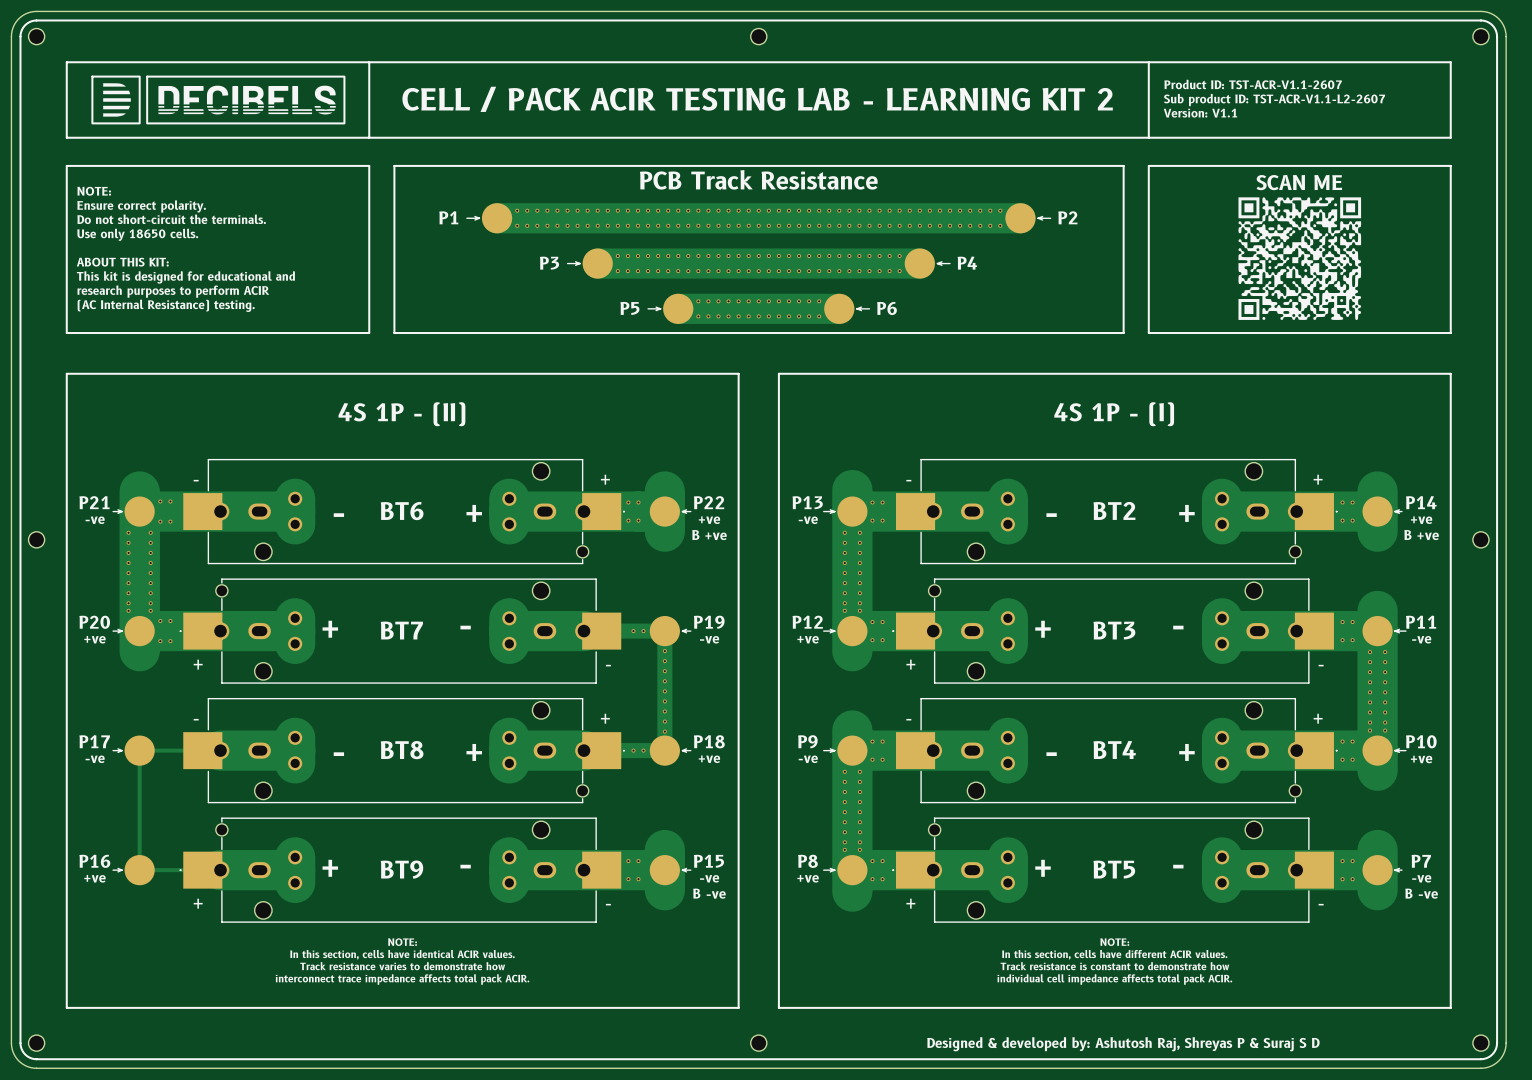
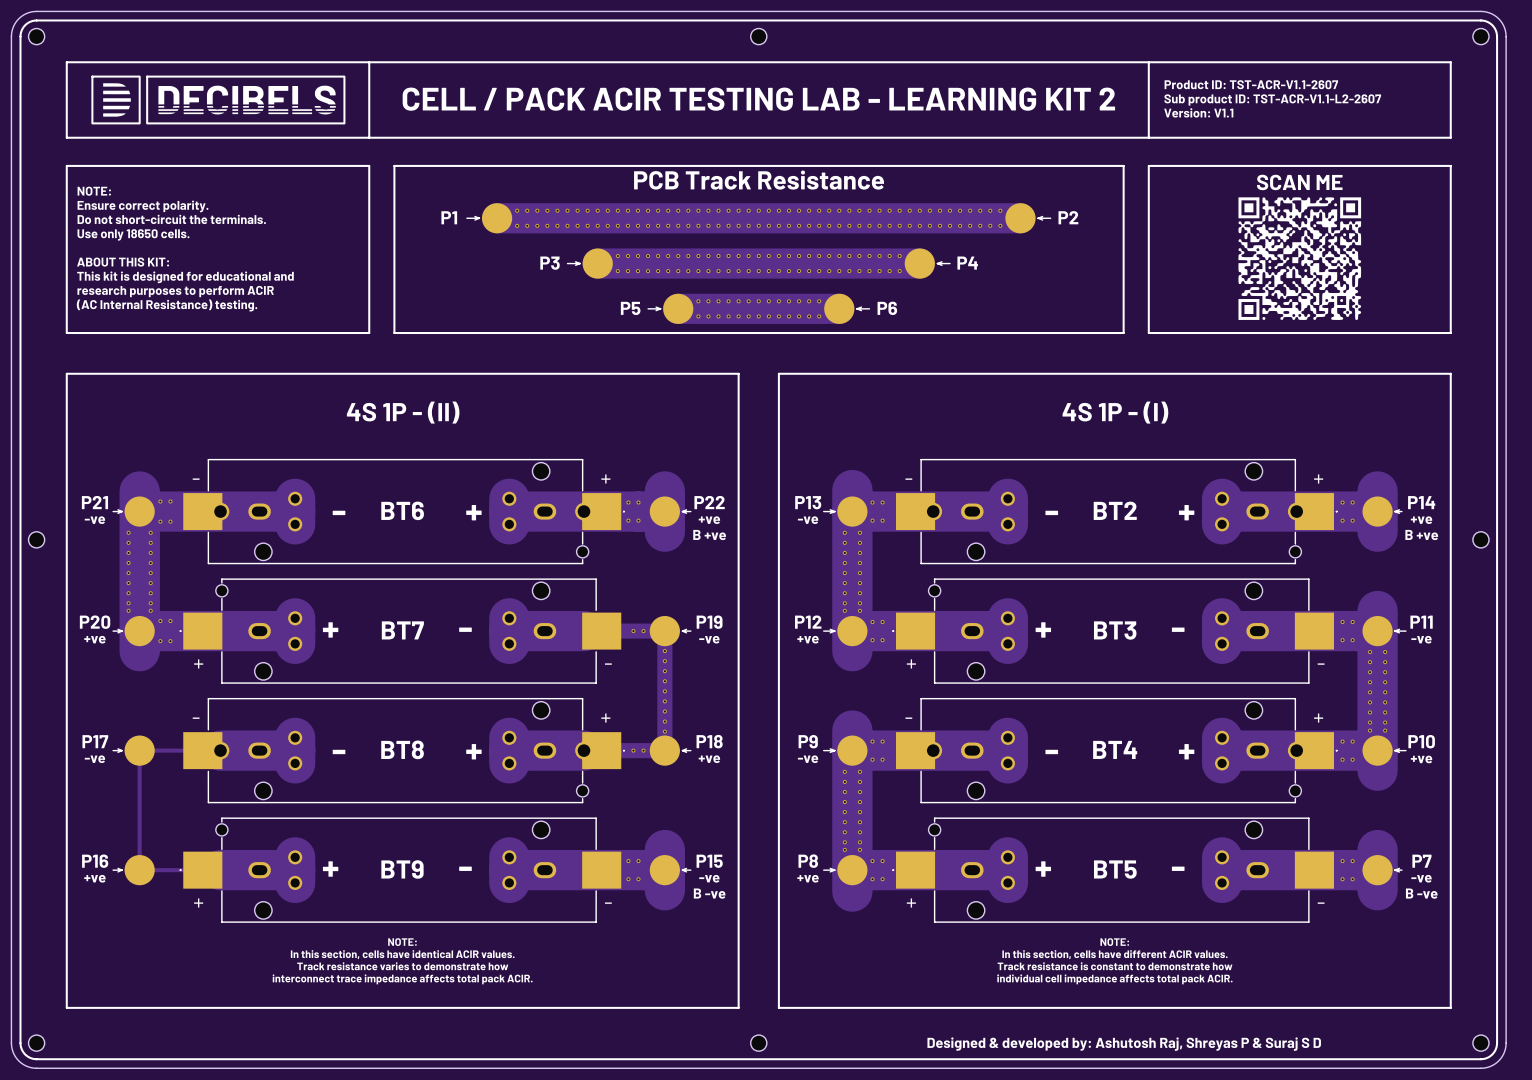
BT7 footprint: [180, 578, 622, 684] -> [180, 578, 622, 684]
BT3 footprint: [892, 578, 1334, 684] -> [892, 578, 1334, 684]
BT9 footprint: [180, 817, 622, 923] -> [180, 817, 622, 923]
BT5 footprint: [892, 817, 1334, 923] -> [892, 817, 1334, 923]

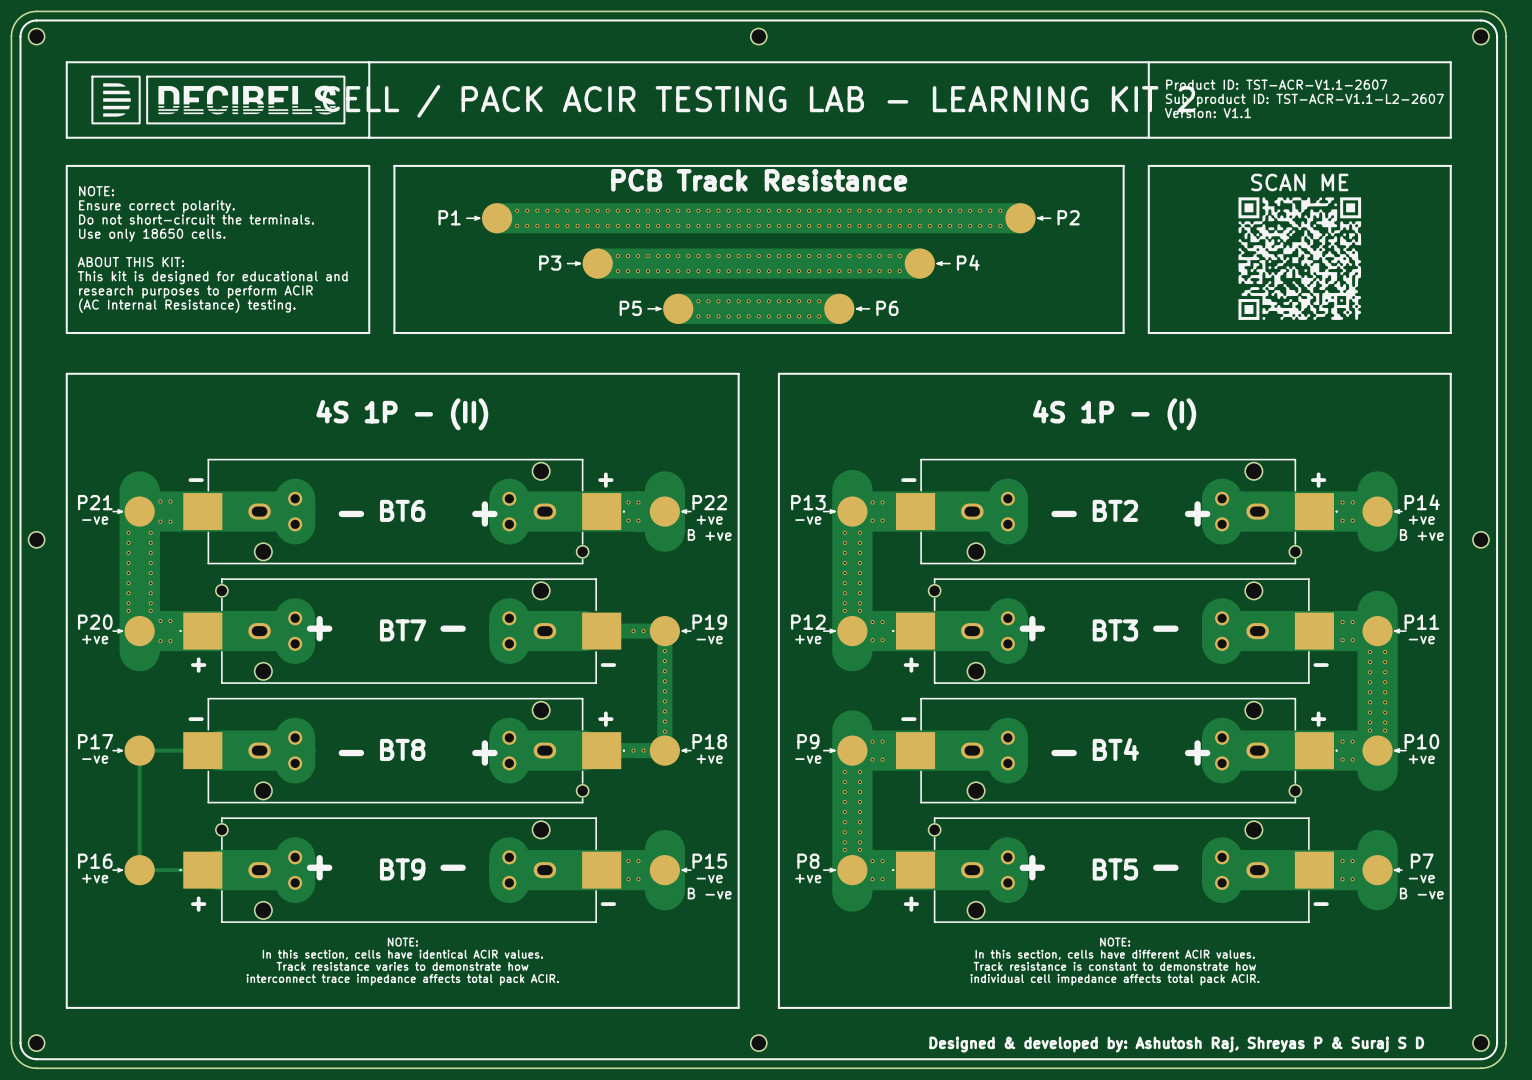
BT6 footprint: [183, 459, 625, 565] -> [183, 459, 625, 565]
BT2 footprint: [895, 459, 1338, 565] -> [895, 459, 1338, 565]
BT8 footprint: [183, 698, 625, 804] -> [183, 698, 625, 804]
BT4 footprint: [895, 698, 1338, 804] -> [895, 698, 1338, 804]

